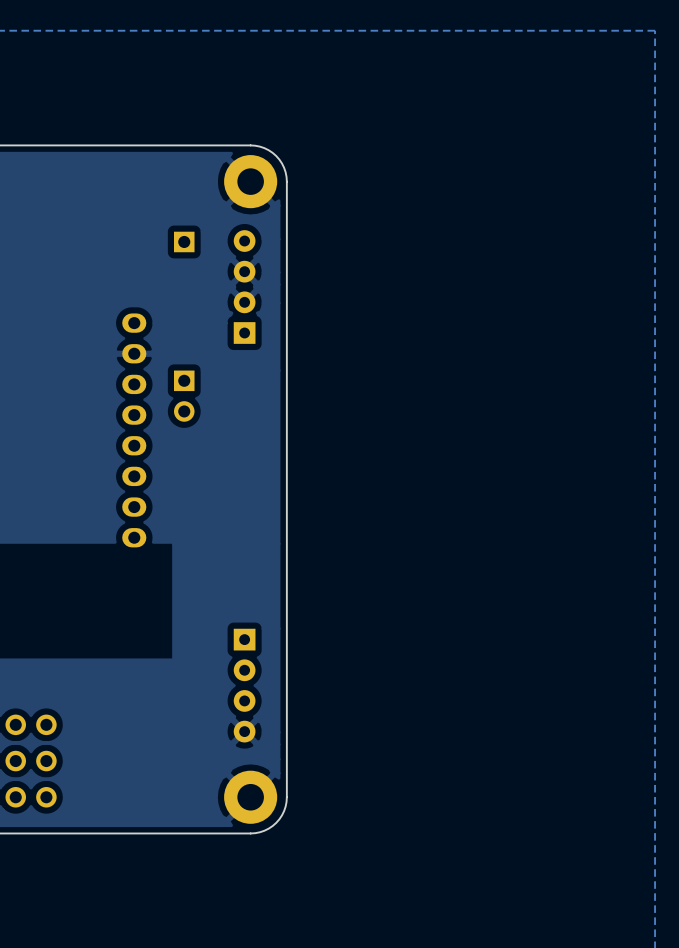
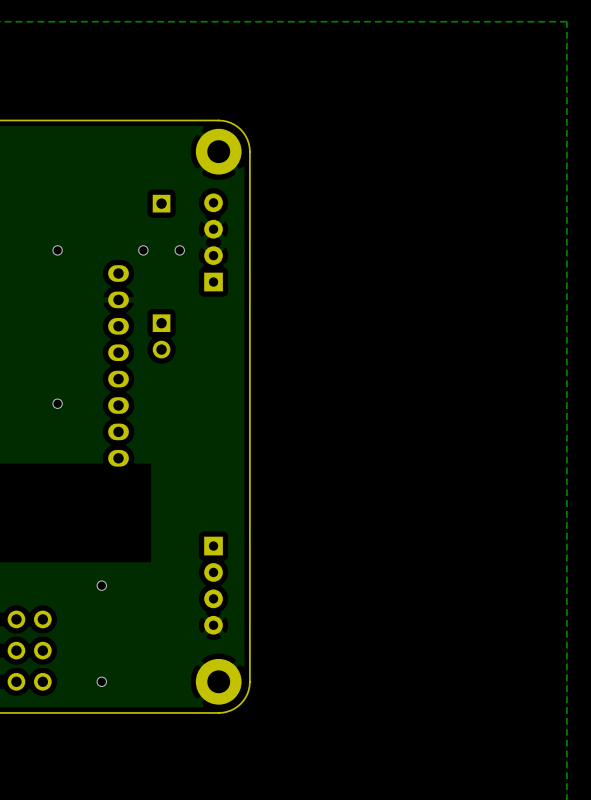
via: none -> (57, 250)
via: none -> (143, 250)
via: none -> (179, 250)
via: none -> (57, 403)
via: none -> (101, 585)
via: none -> (101, 681)

